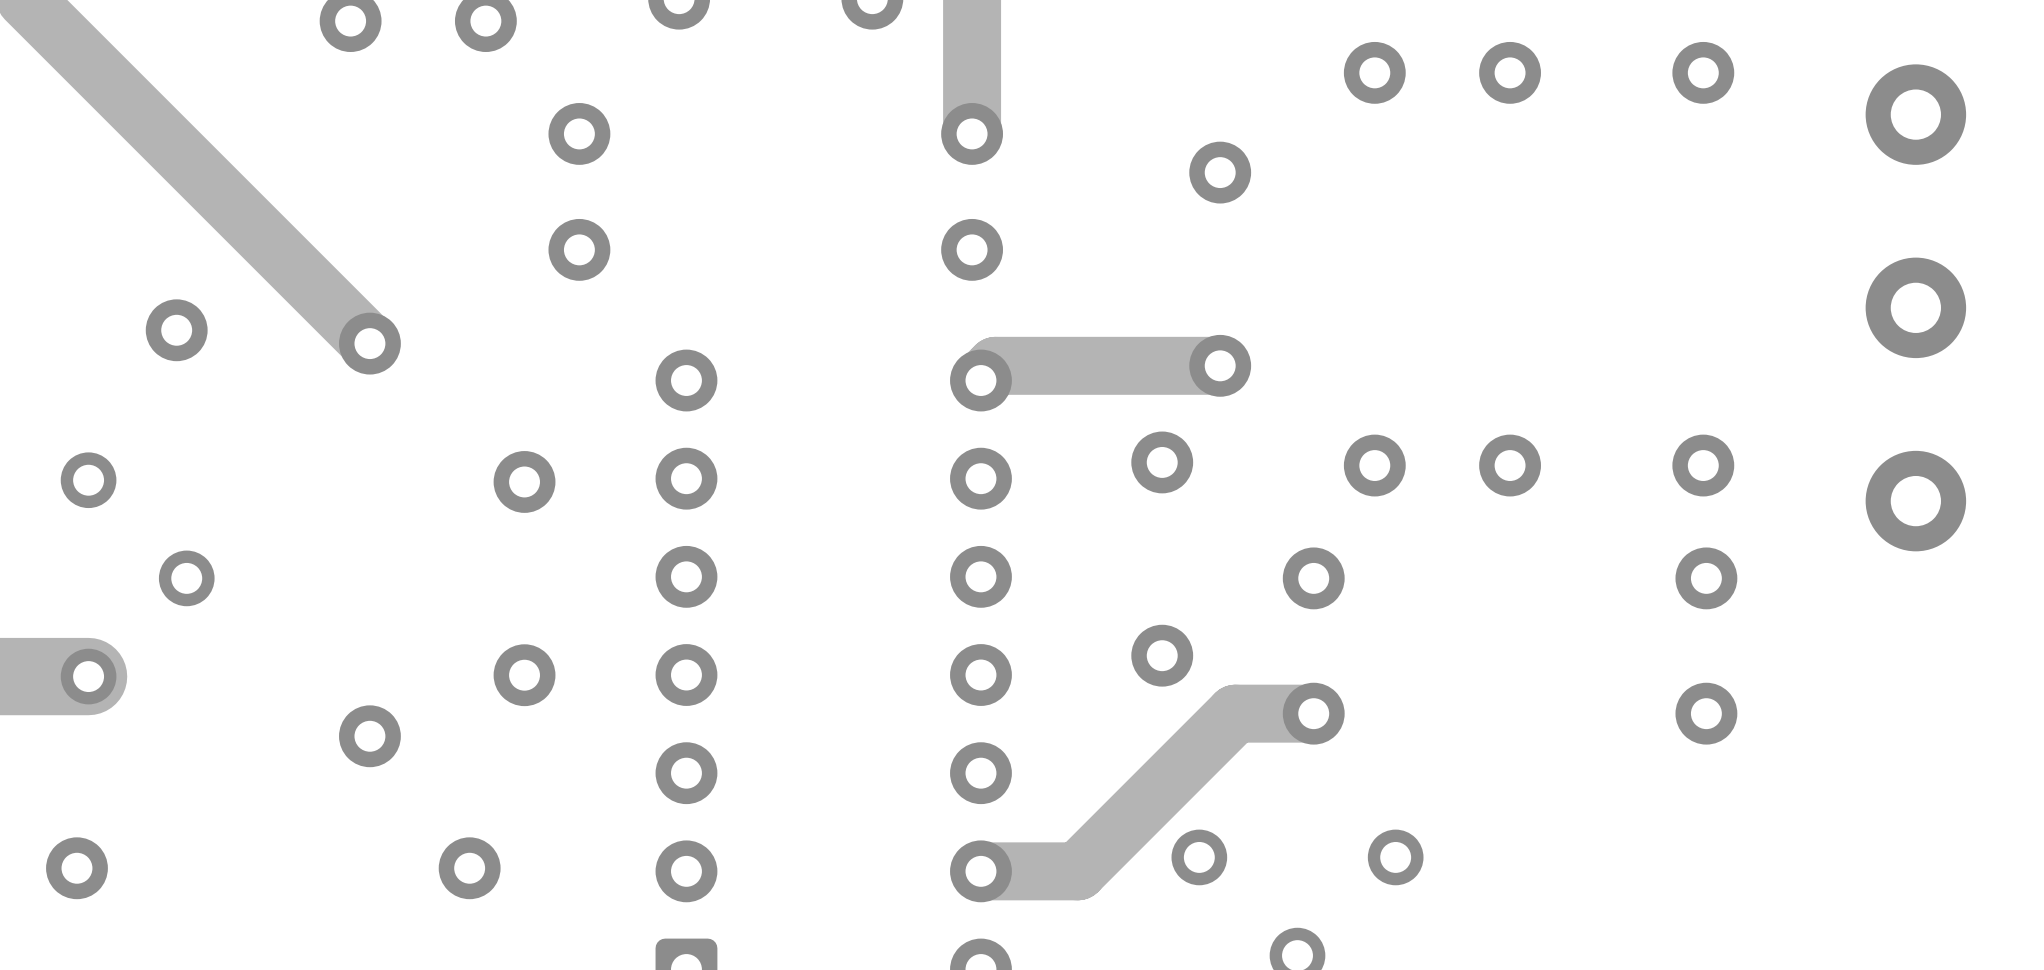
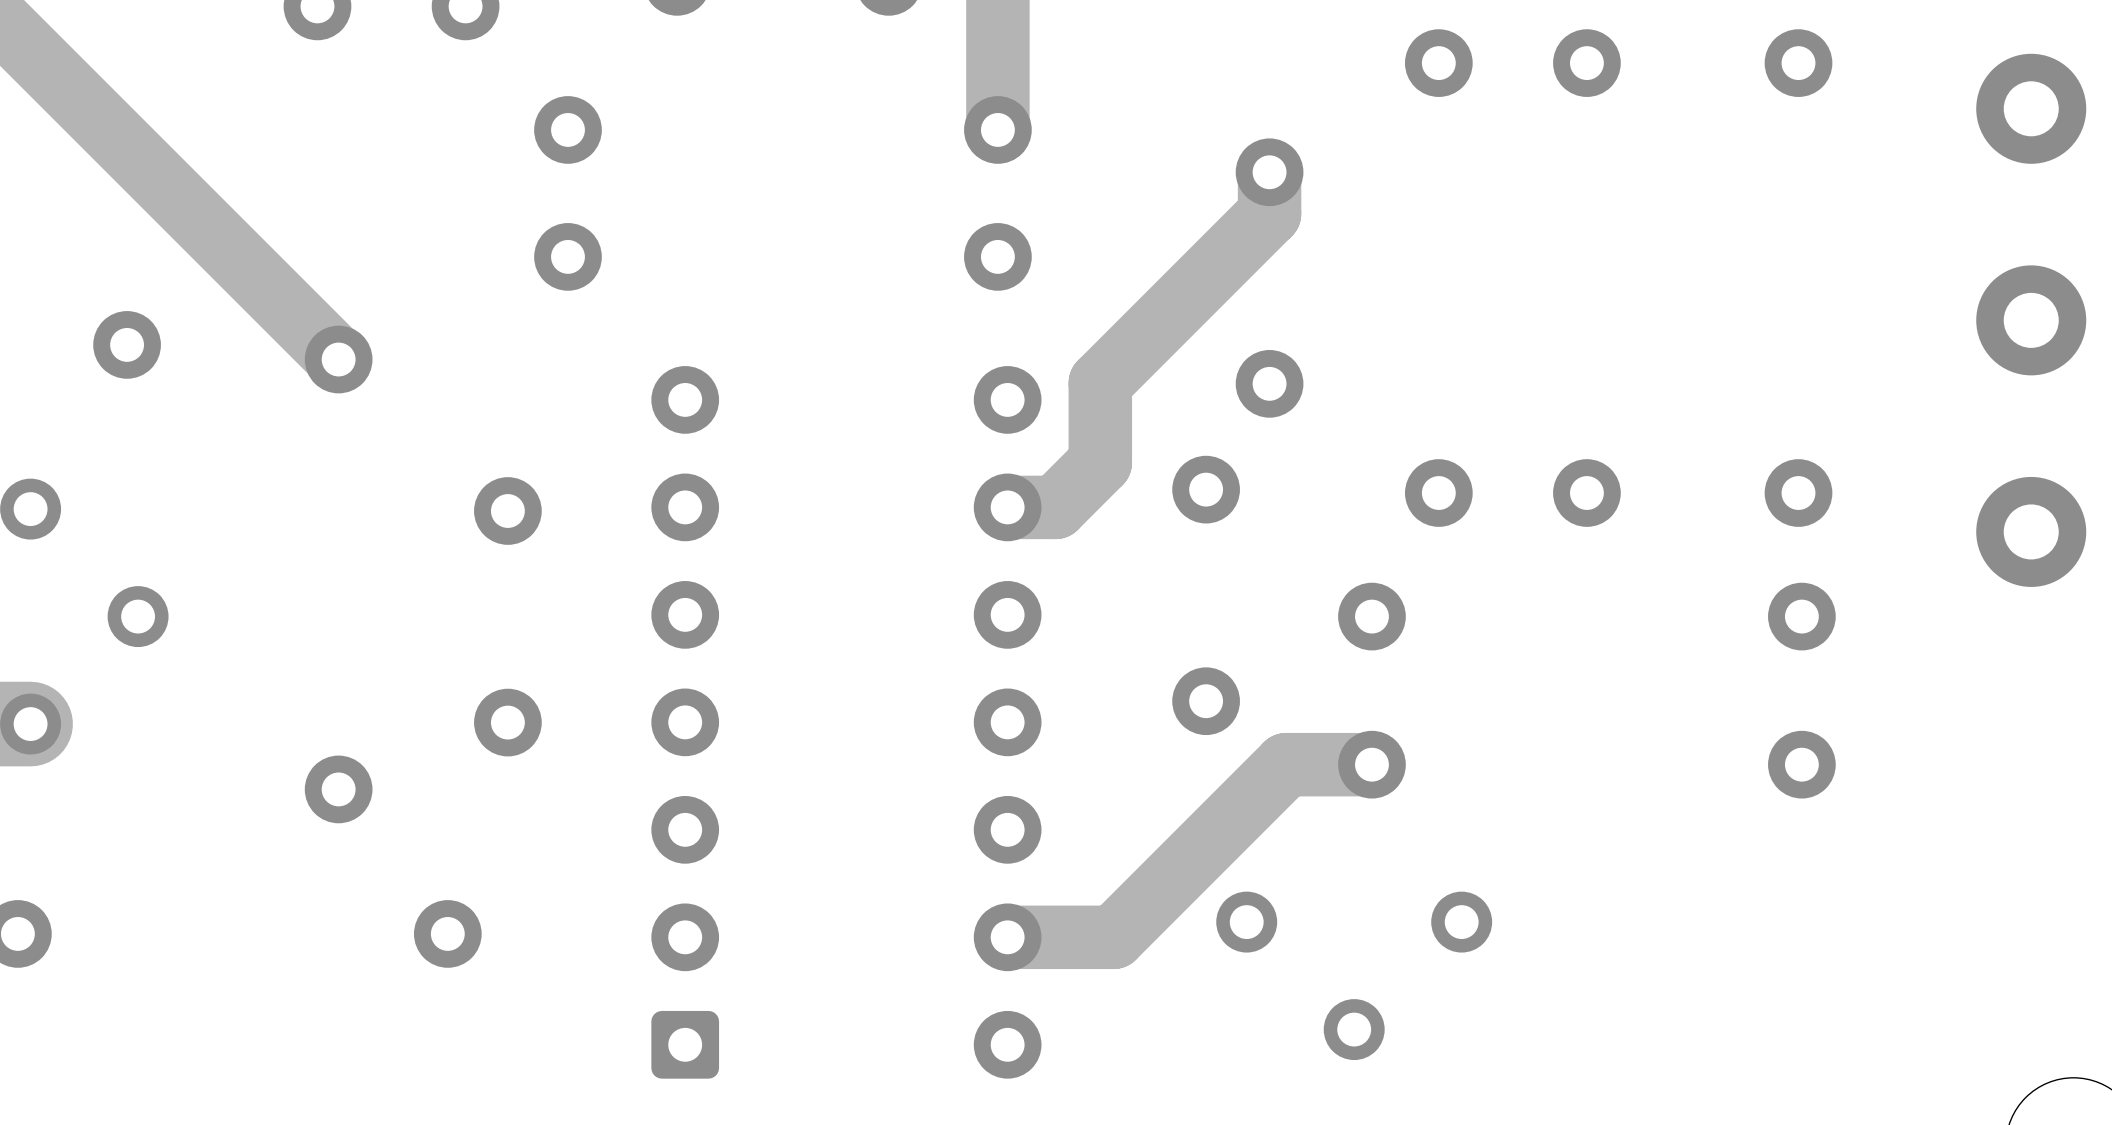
track: none -> (1269, 172) (1269, 213) (1100, 382) (1100, 462) (1055, 507) (1007, 507)
track: (1220, 365) (995, 365) (980, 380) -> none

